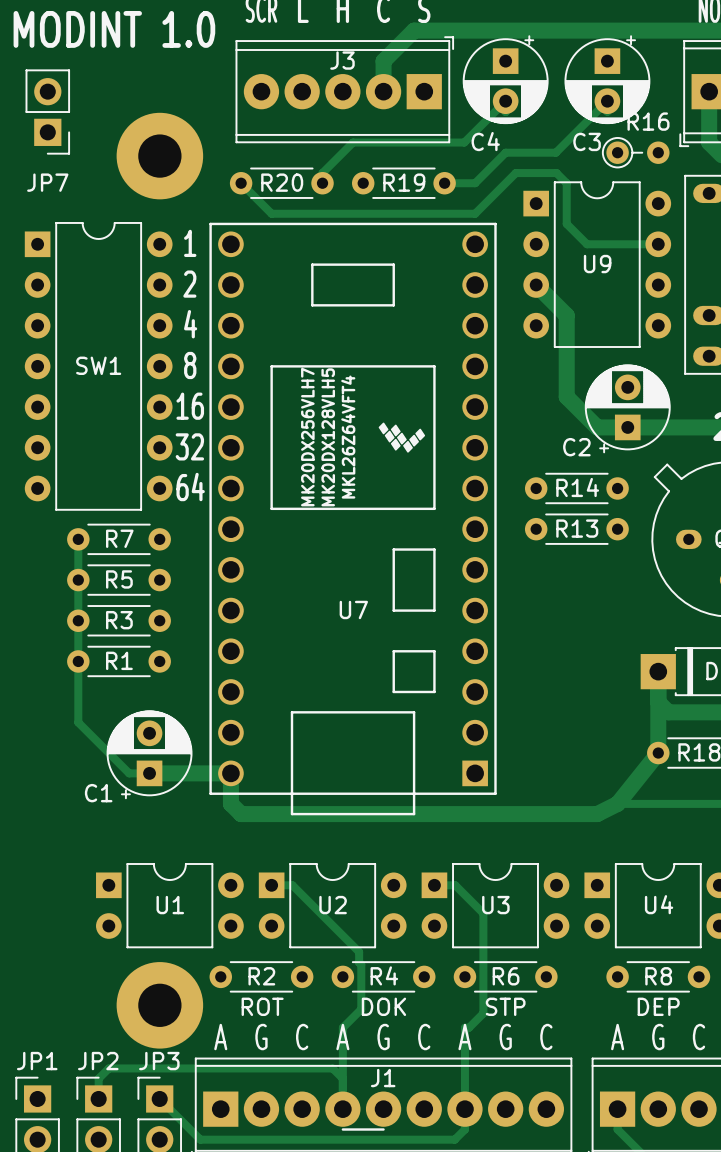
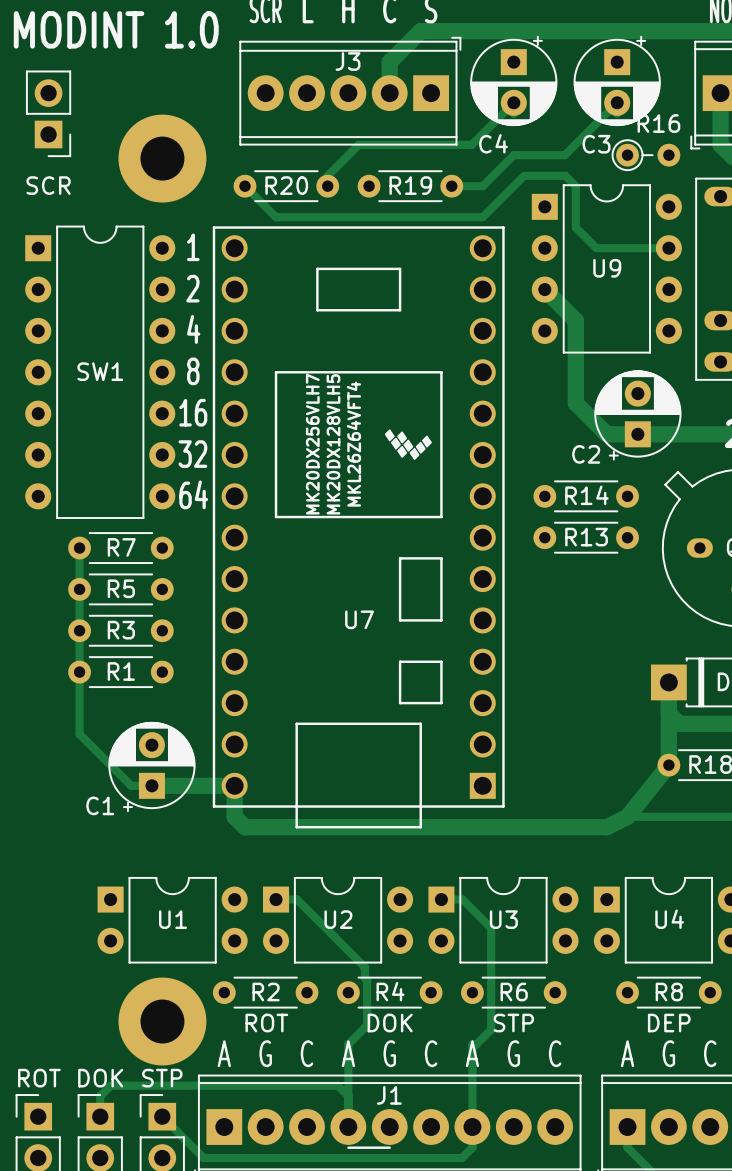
JP7 name: JP7 (47, 182) -> SCR (48, 185)
JP1 name: JP1 (37, 1061) -> ROT (39, 1078)
JP2 name: JP2 (98, 1061) -> DOK (100, 1078)
JP3 name: JP3 (159, 1061) -> STP (162, 1078)

